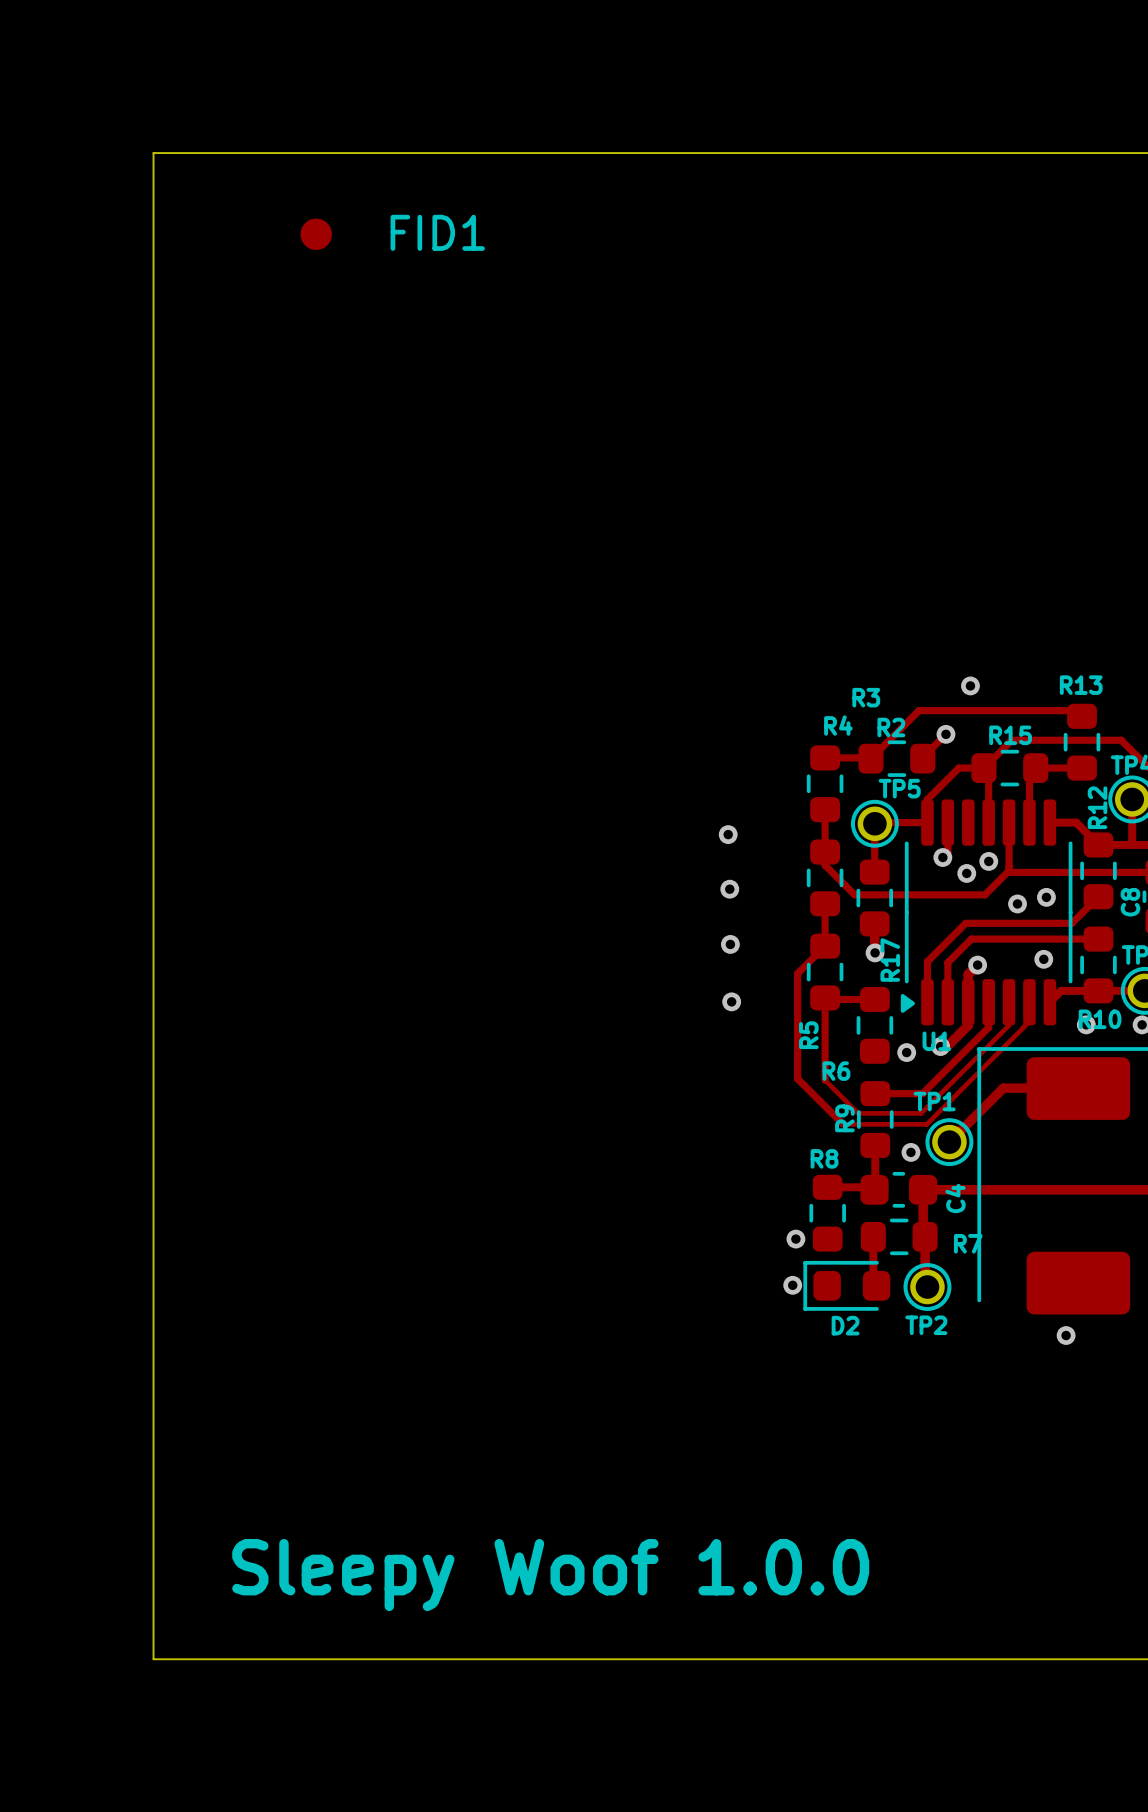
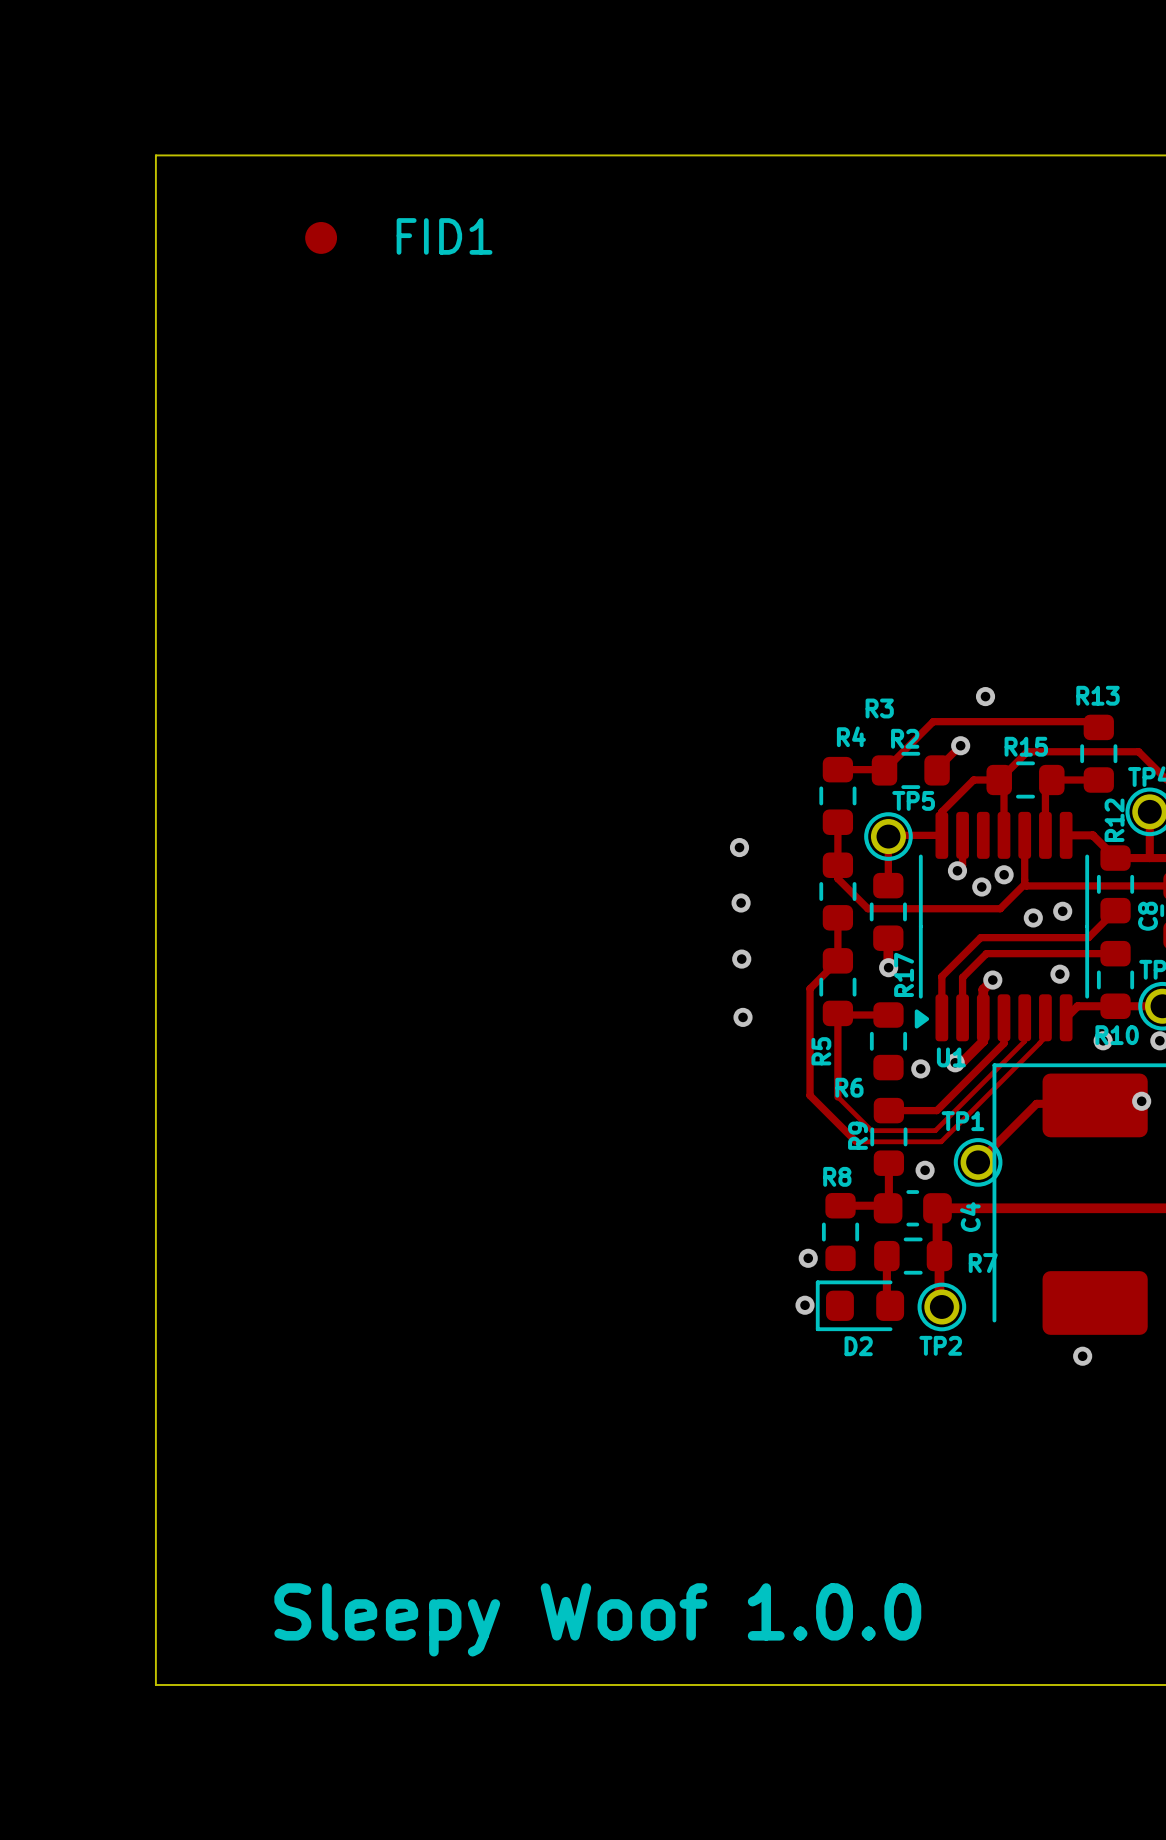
via: none -> (1141, 1101)
track: none -> (1083, 1103) (1036, 1103) (978, 1162)
track: (1078, 1088) (1003, 1088) (949, 1142) -> none
TP1 position: (949, 1142) -> (978, 1162)
text position: Sleepy Woof 1.0.0 (550, 1575) -> Sleepy Woof 1.0.0 (597, 1619)

